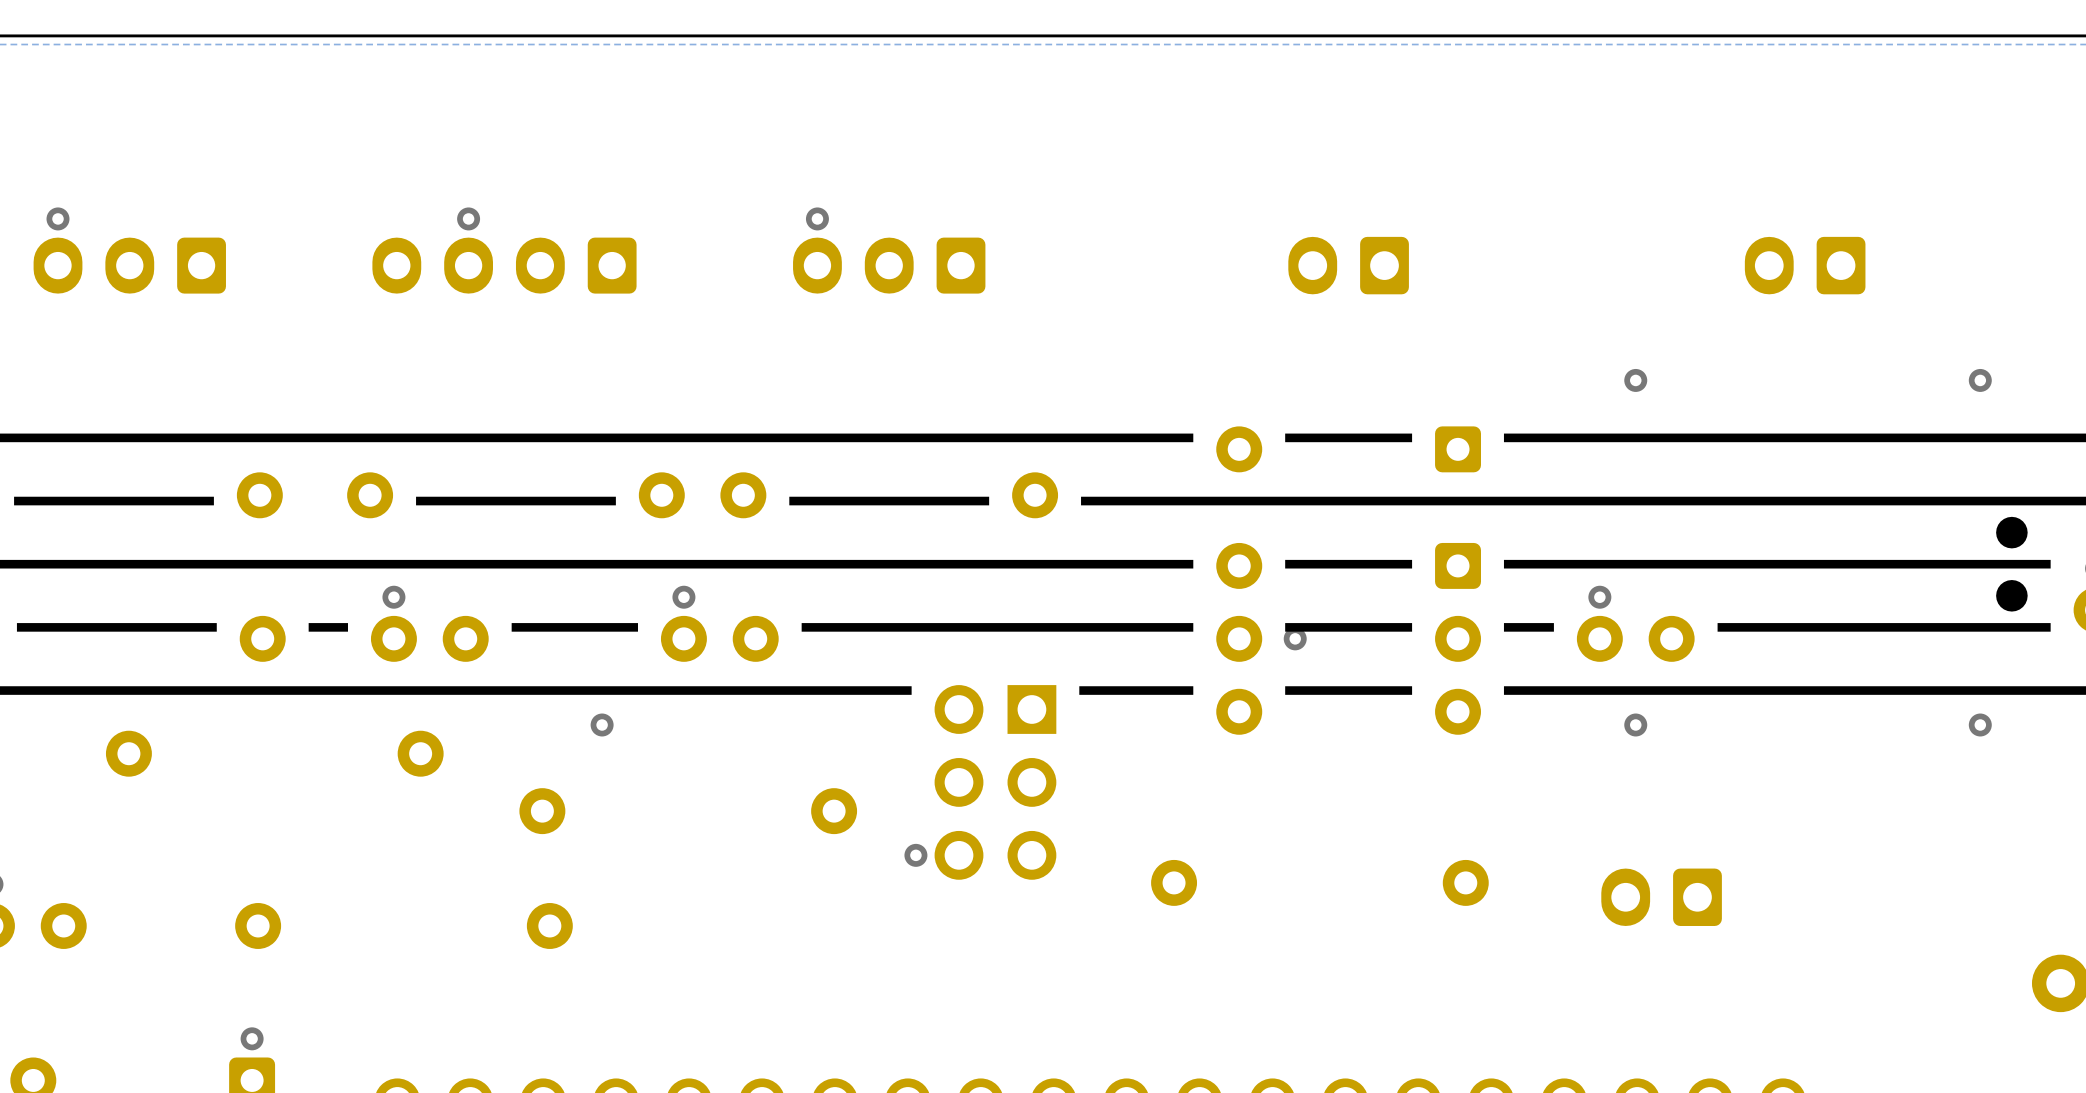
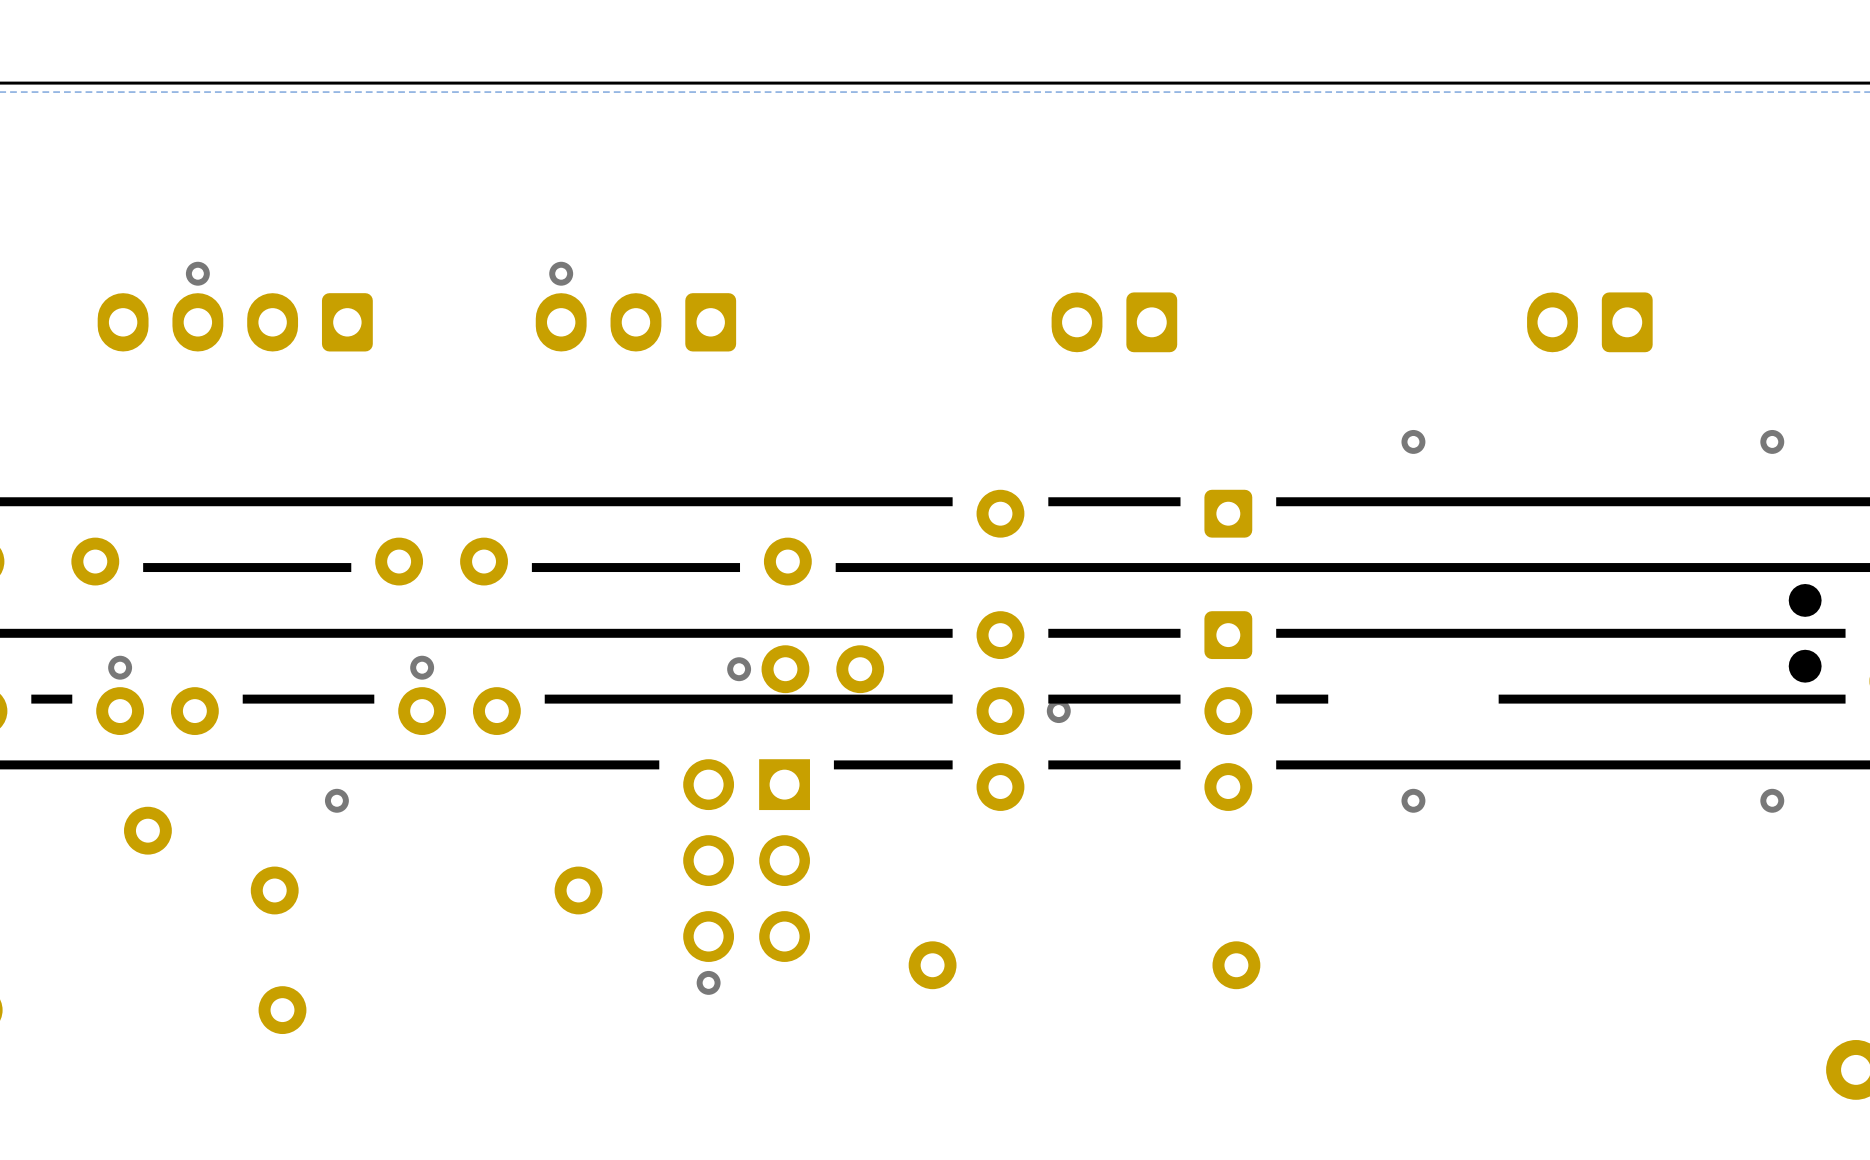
via: (1599, 597) -> none
via: none -> (739, 669)
part position: (1635, 638) -> (822, 669)
via position: (915, 855) -> (708, 982)
part: (1661, 897) -> none

